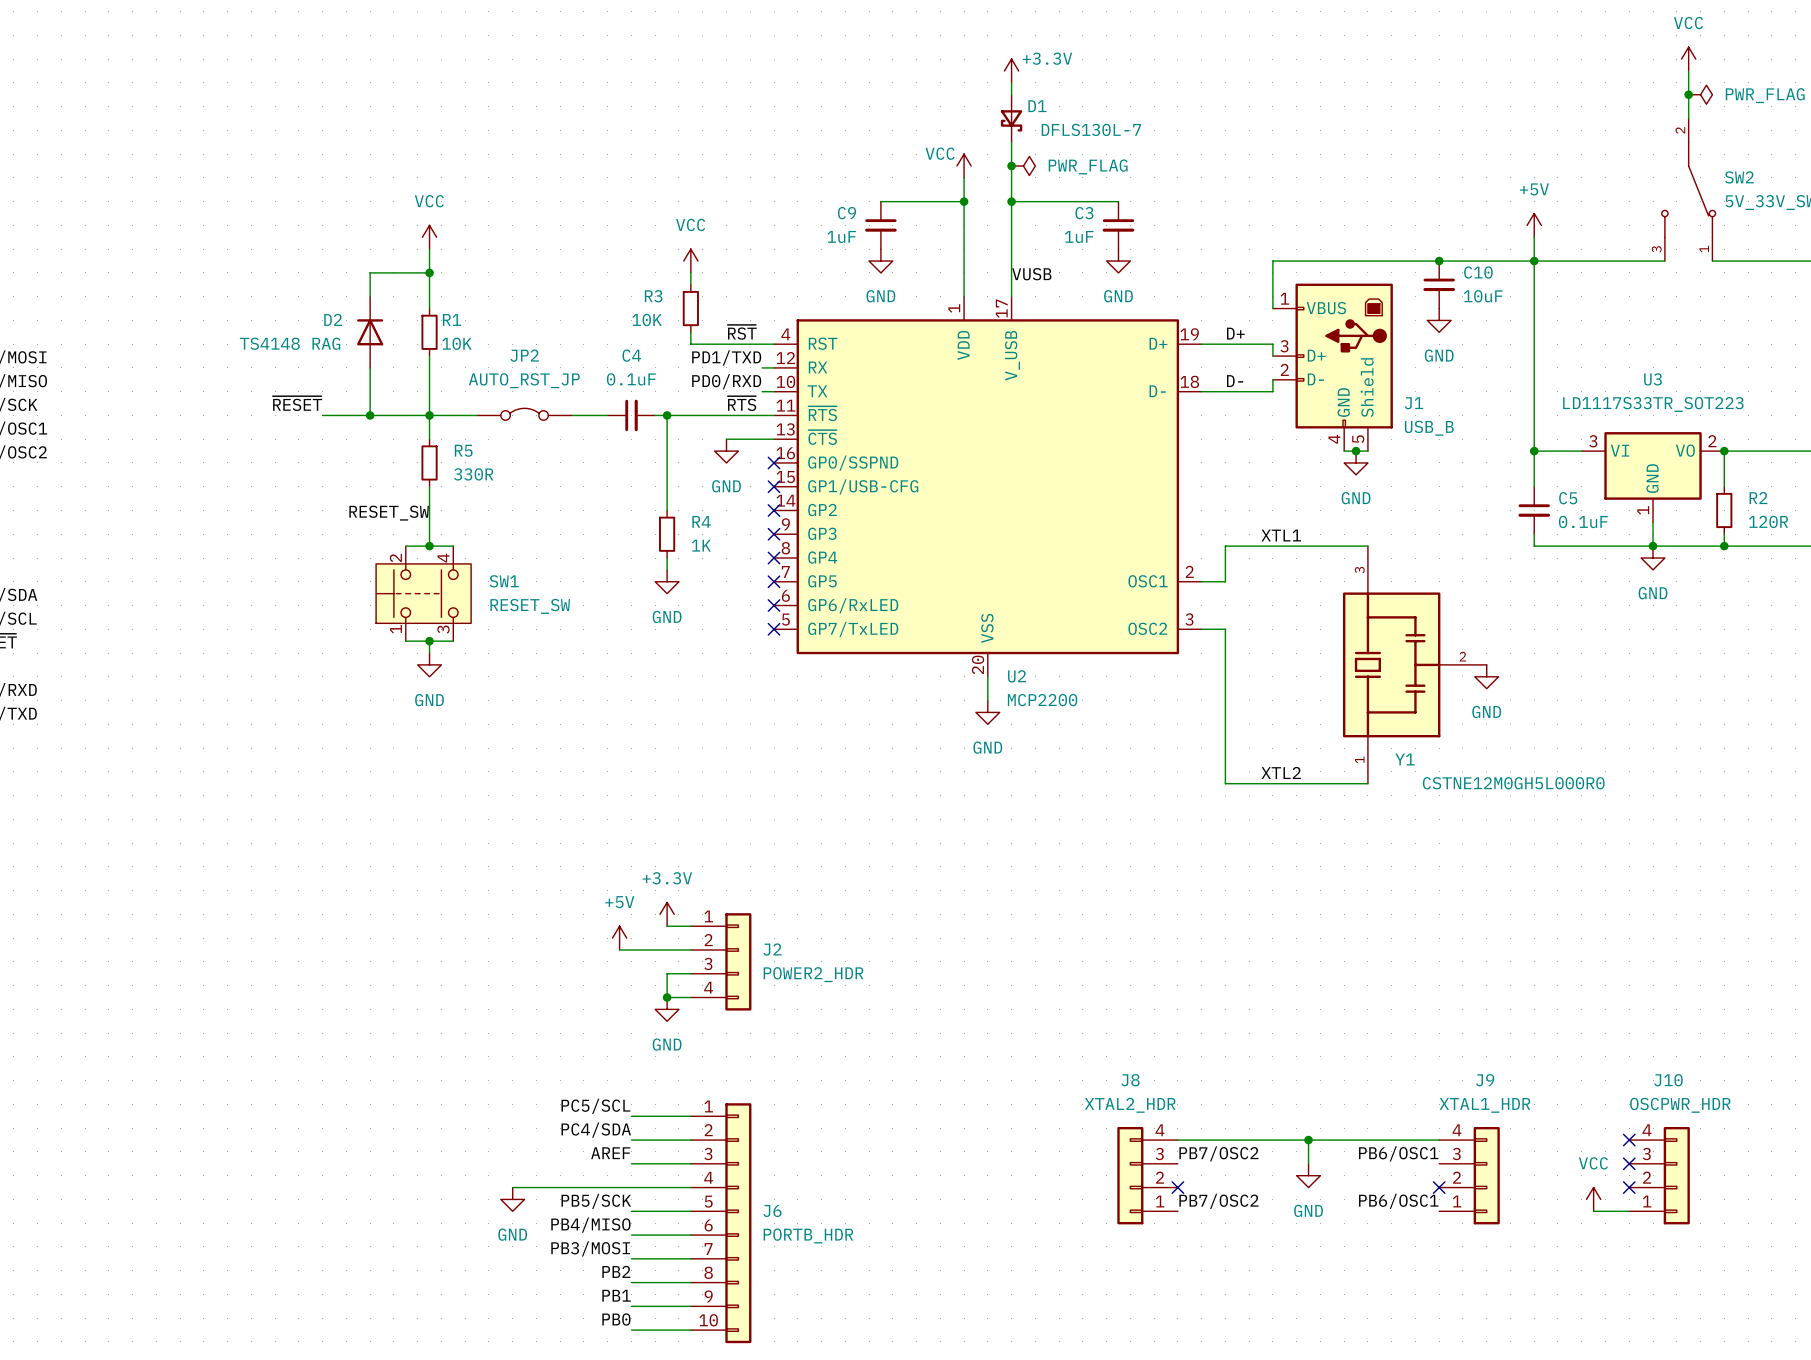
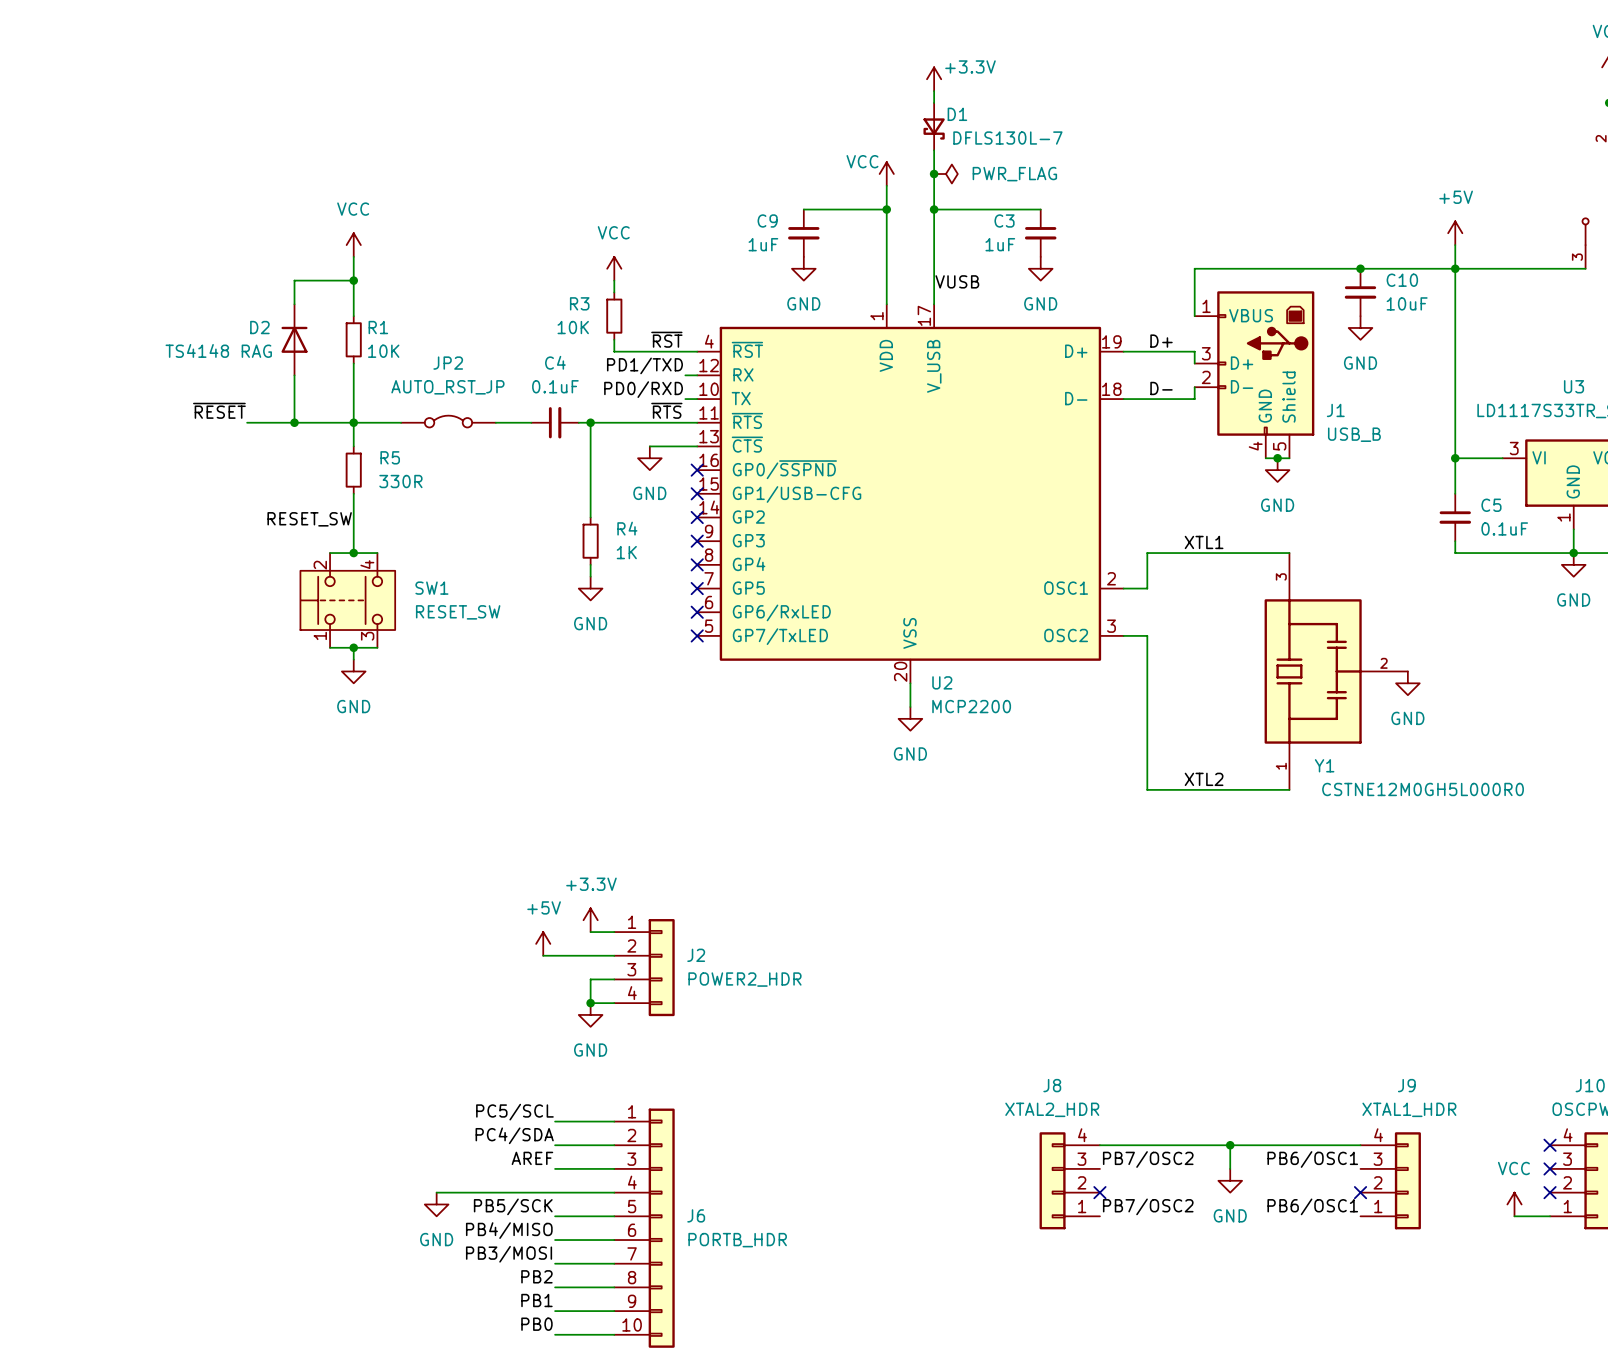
U2 pin name: RST (823, 343) -> ~{RST} (747, 349)
U2 pin name: GP0/SSPND (853, 463) -> GP0/~{SSPND} (784, 469)

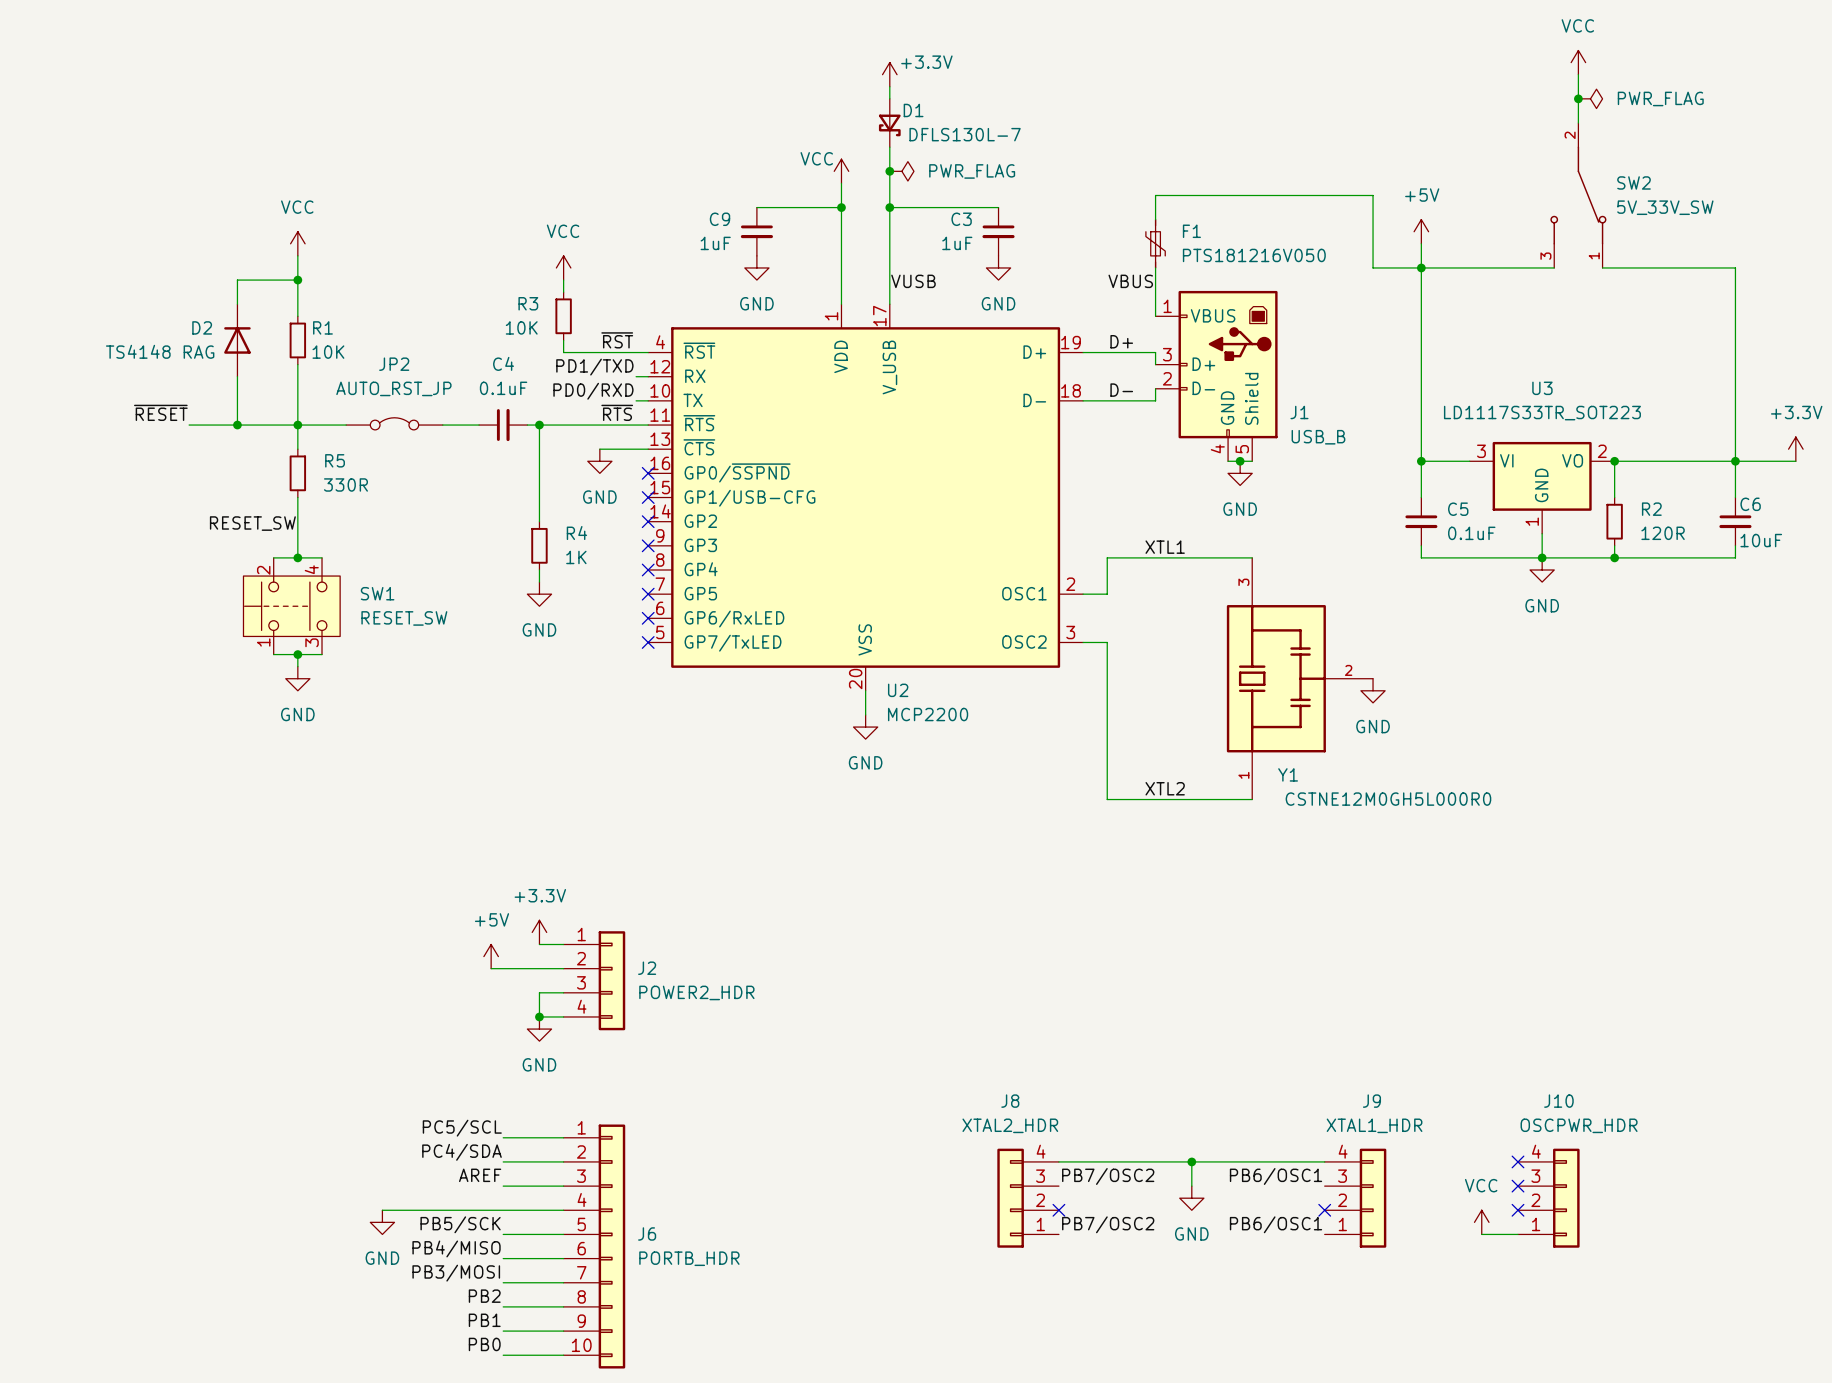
F1: none -> PTS181216V050 (1155, 243)
wire: (1194, 268) (1407, 268) -> (1155, 219) (1155, 195) (1373, 195) (1373, 267)
junction: (1360, 268) -> none
label: none -> VBUS (1130, 281)
C10: 10uF (1360, 292) -> none
power symbol: GND (1360, 327) -> none

